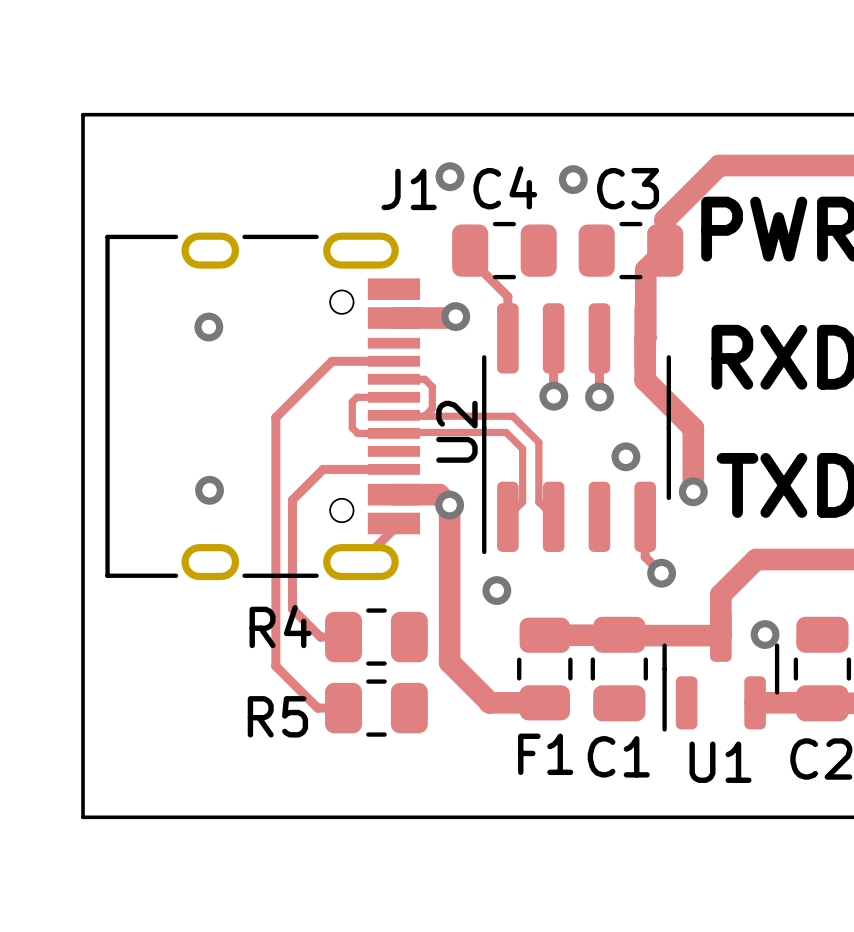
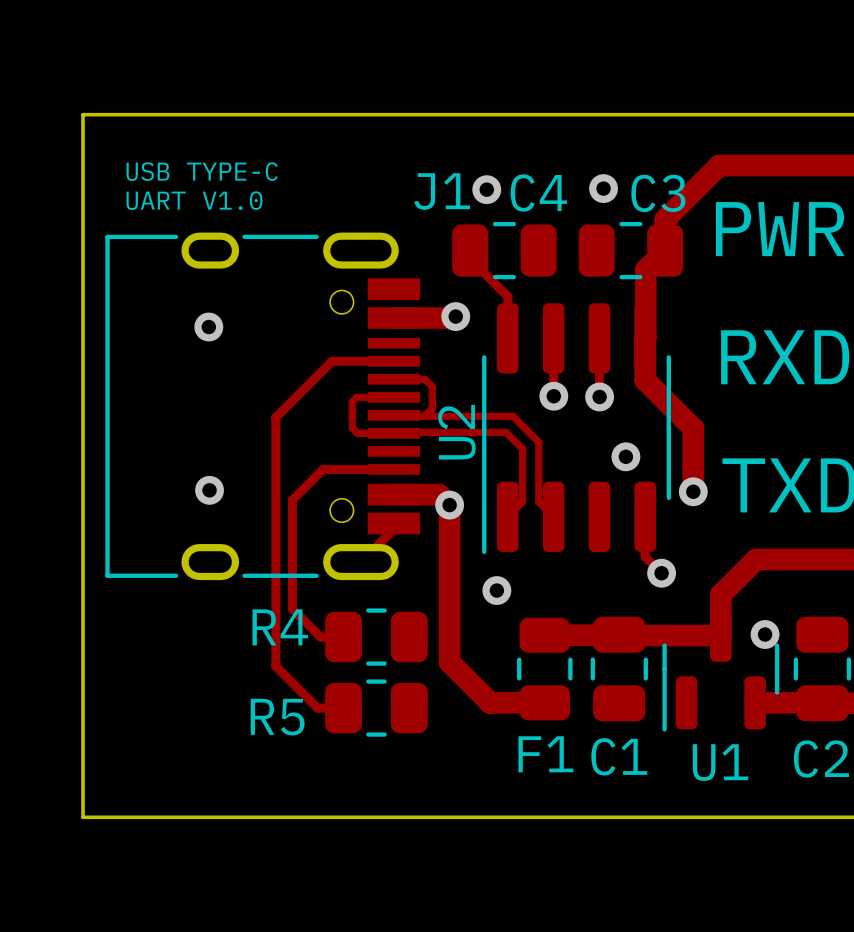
text: none -> USB TYPE-C (202, 171)
via position: (449, 176) -> (486, 189)
via position: (573, 179) -> (603, 188)
C4 name position: C4 (505, 187) -> C4 (538, 193)
C3 name position: C3 (628, 188) -> C3 (658, 193)
J1 name position: J1 (409, 189) -> J1 (442, 191)
text: none -> UART V1.0 (194, 200)

